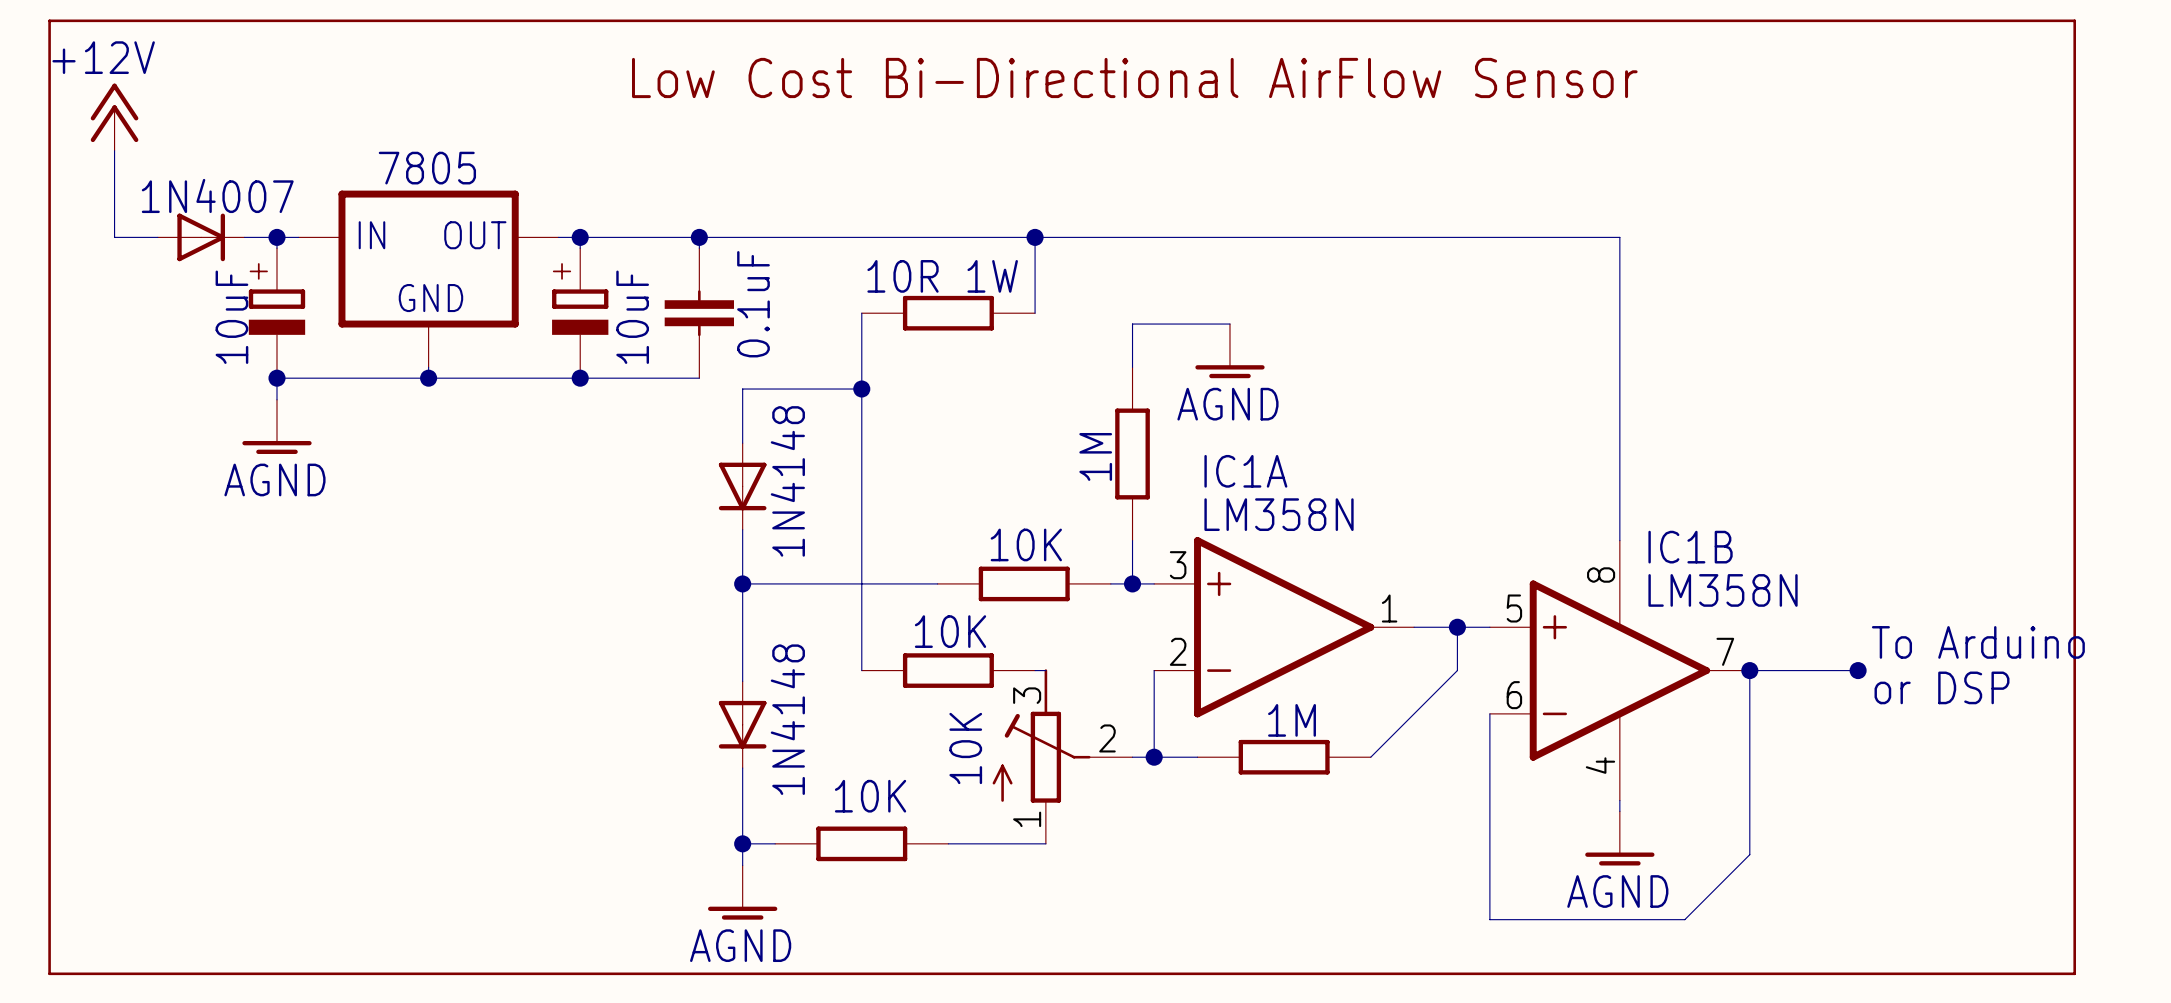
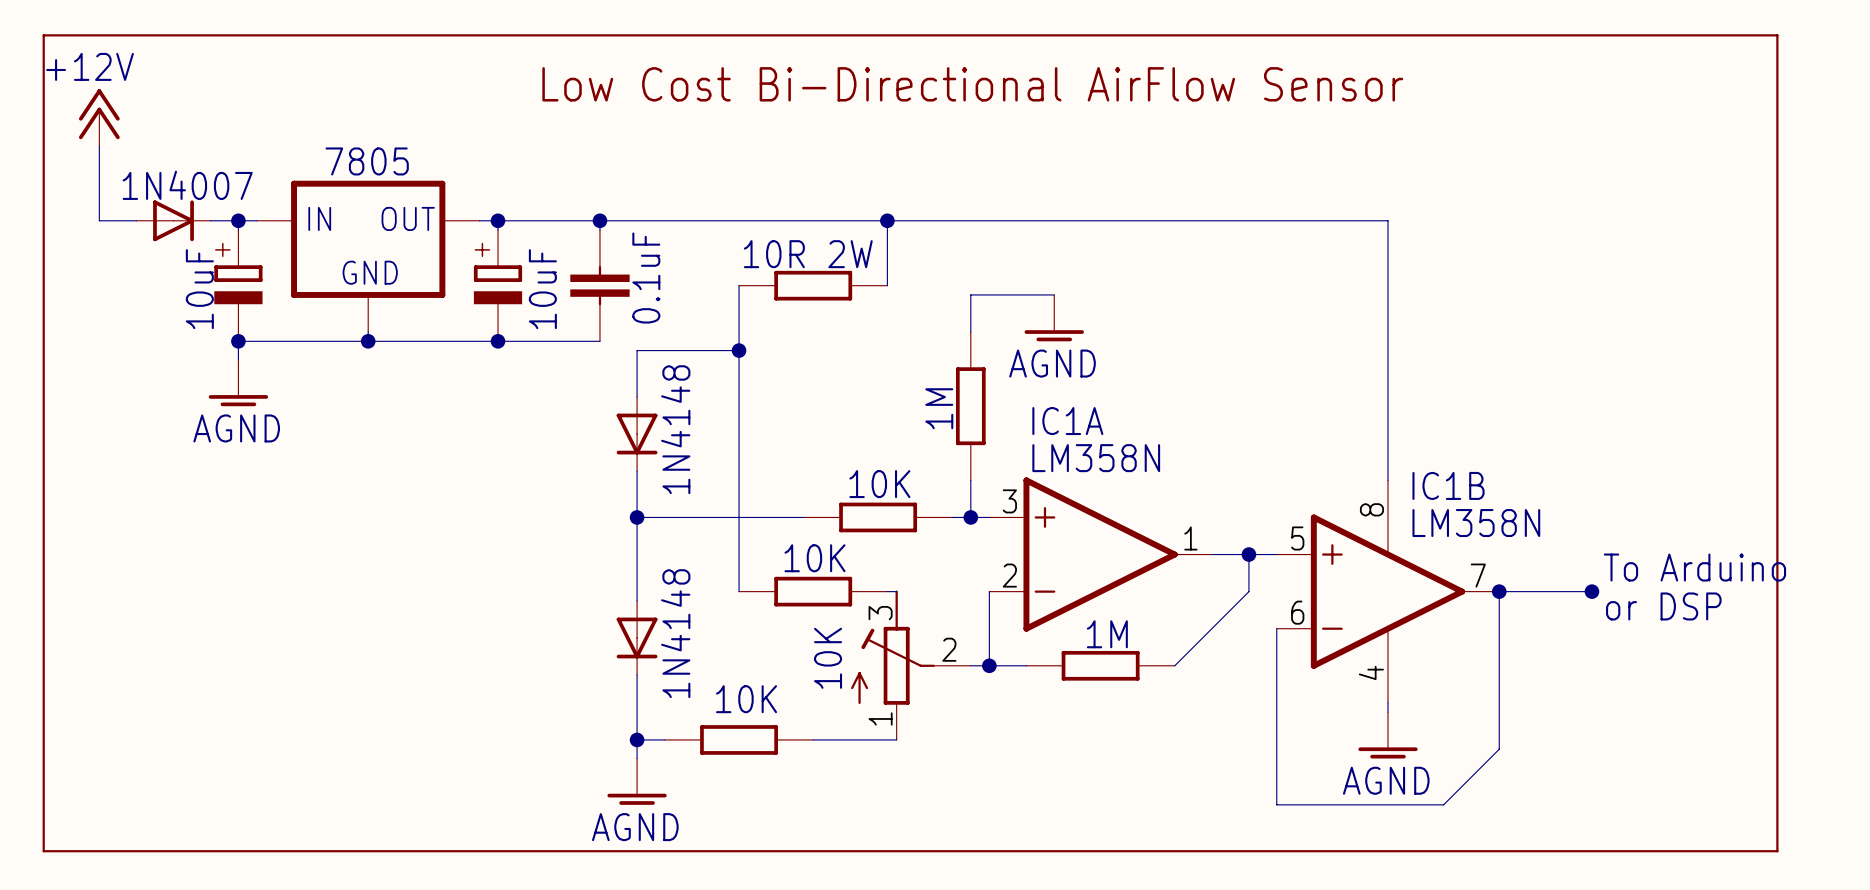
part value: 10R 1W (942, 276) -> 10R 2W (808, 254)

